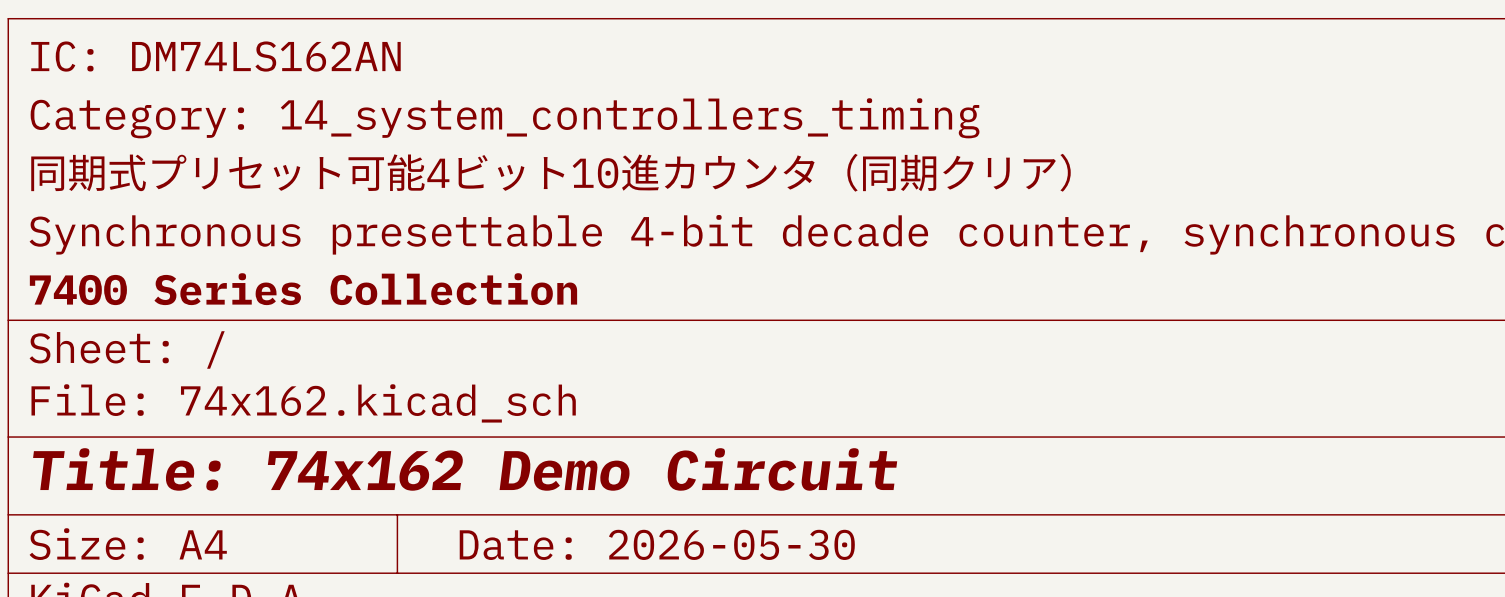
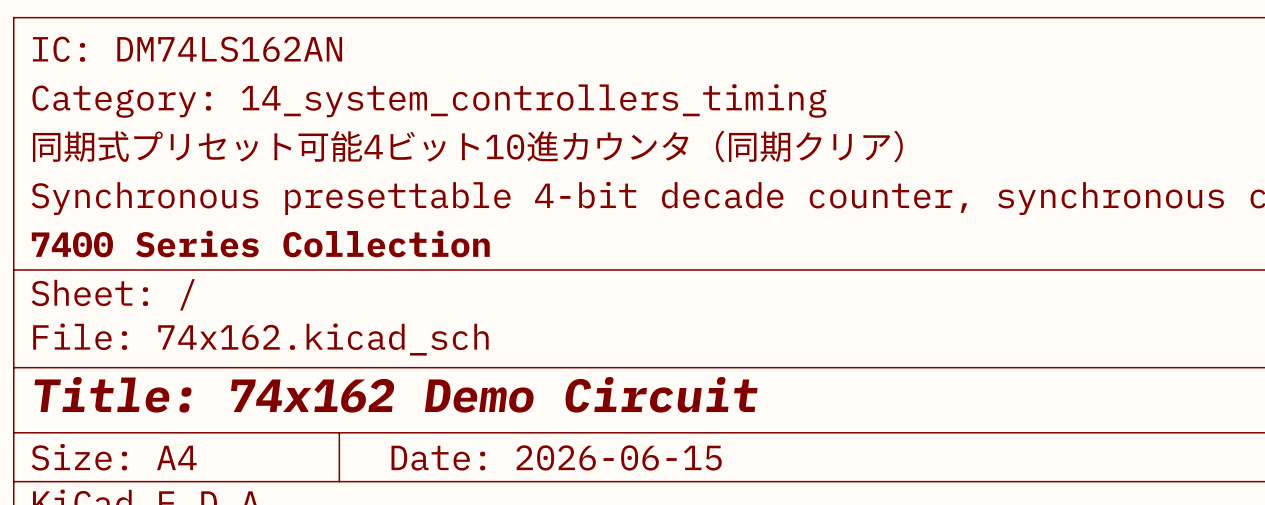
title block: Date: 2026-05-30 (657, 544) -> Date: 2026-06-15 (556, 457)

